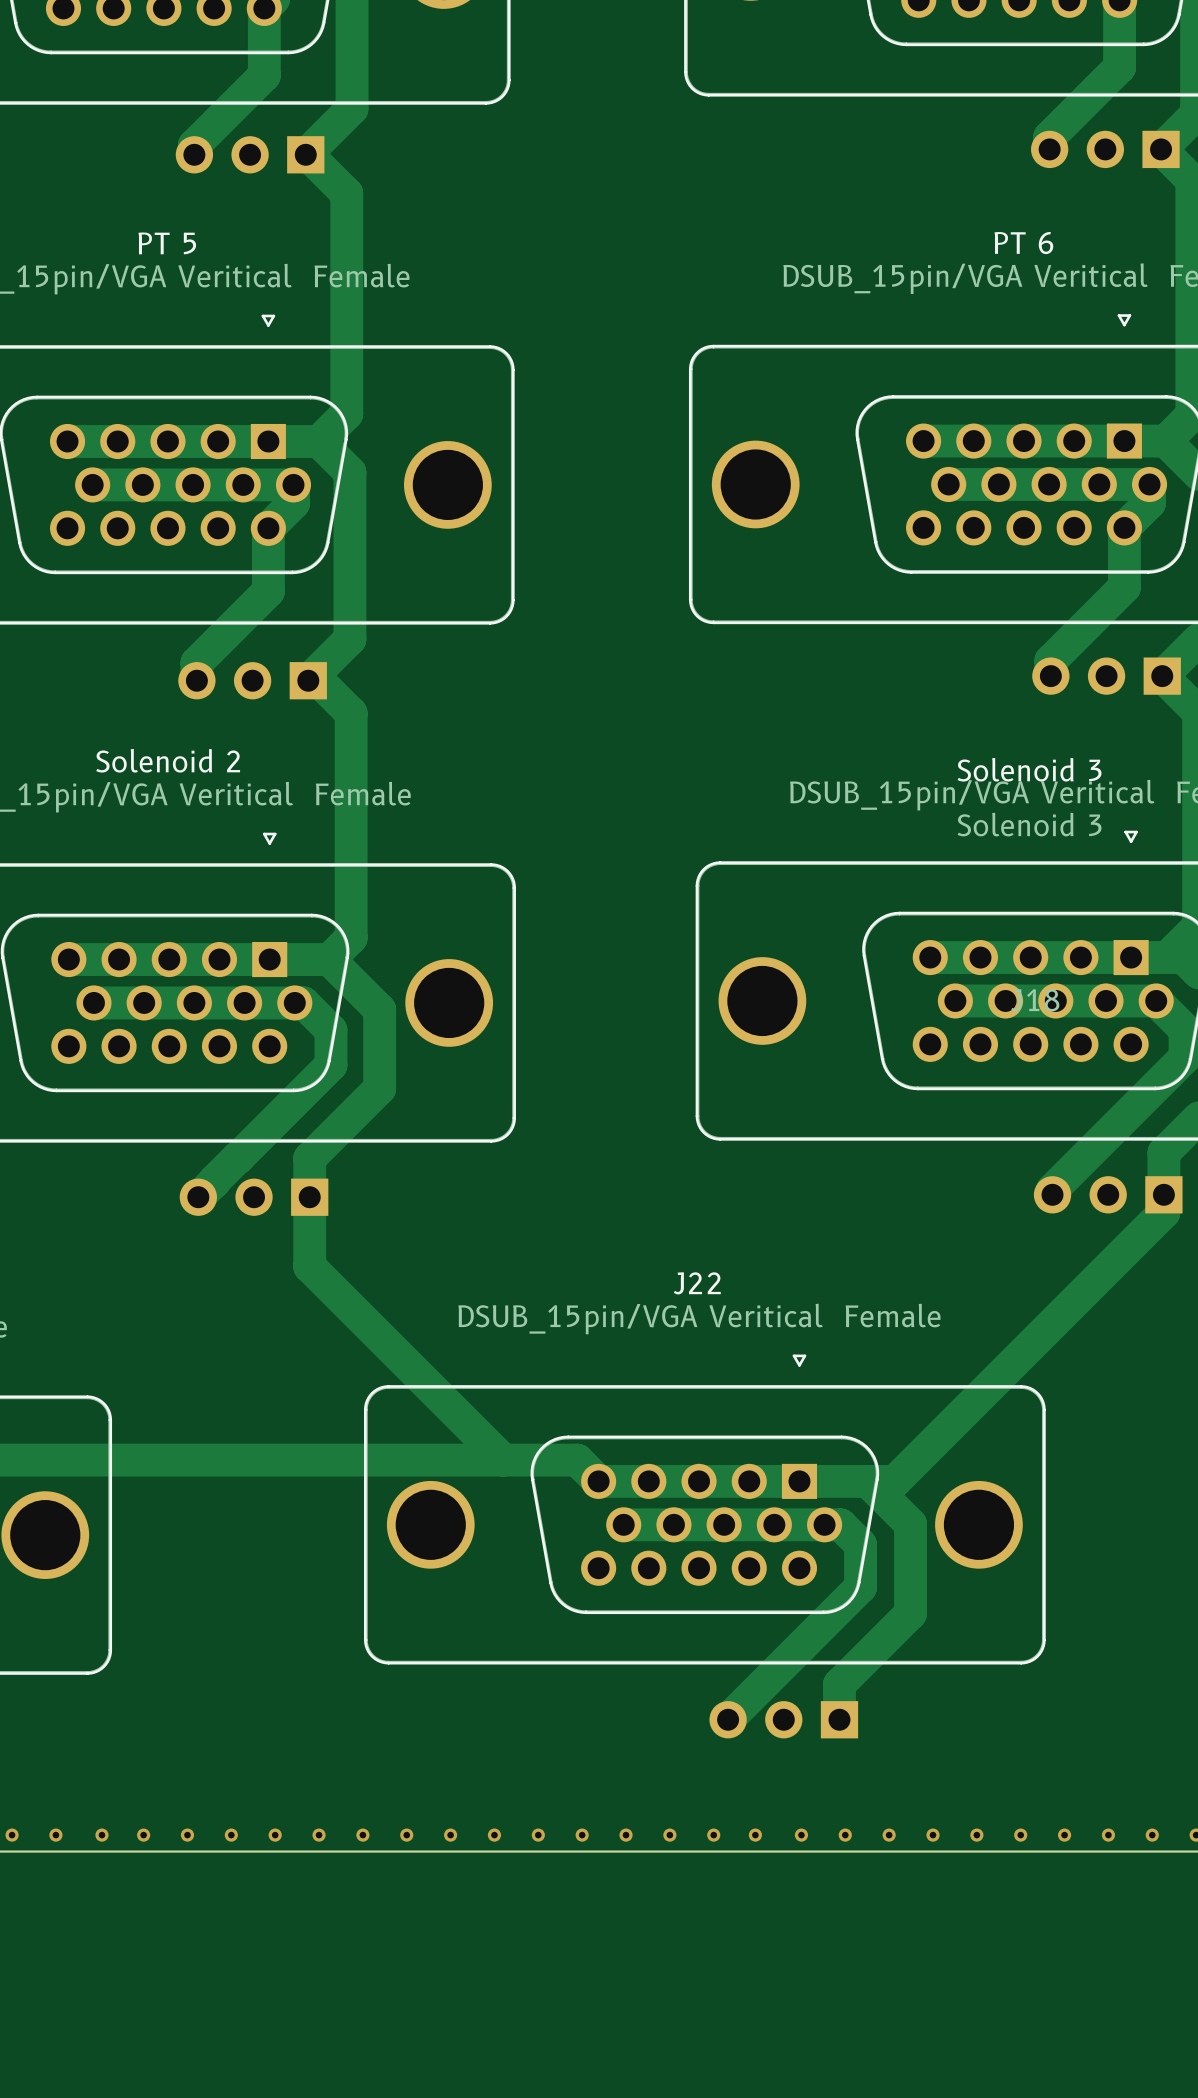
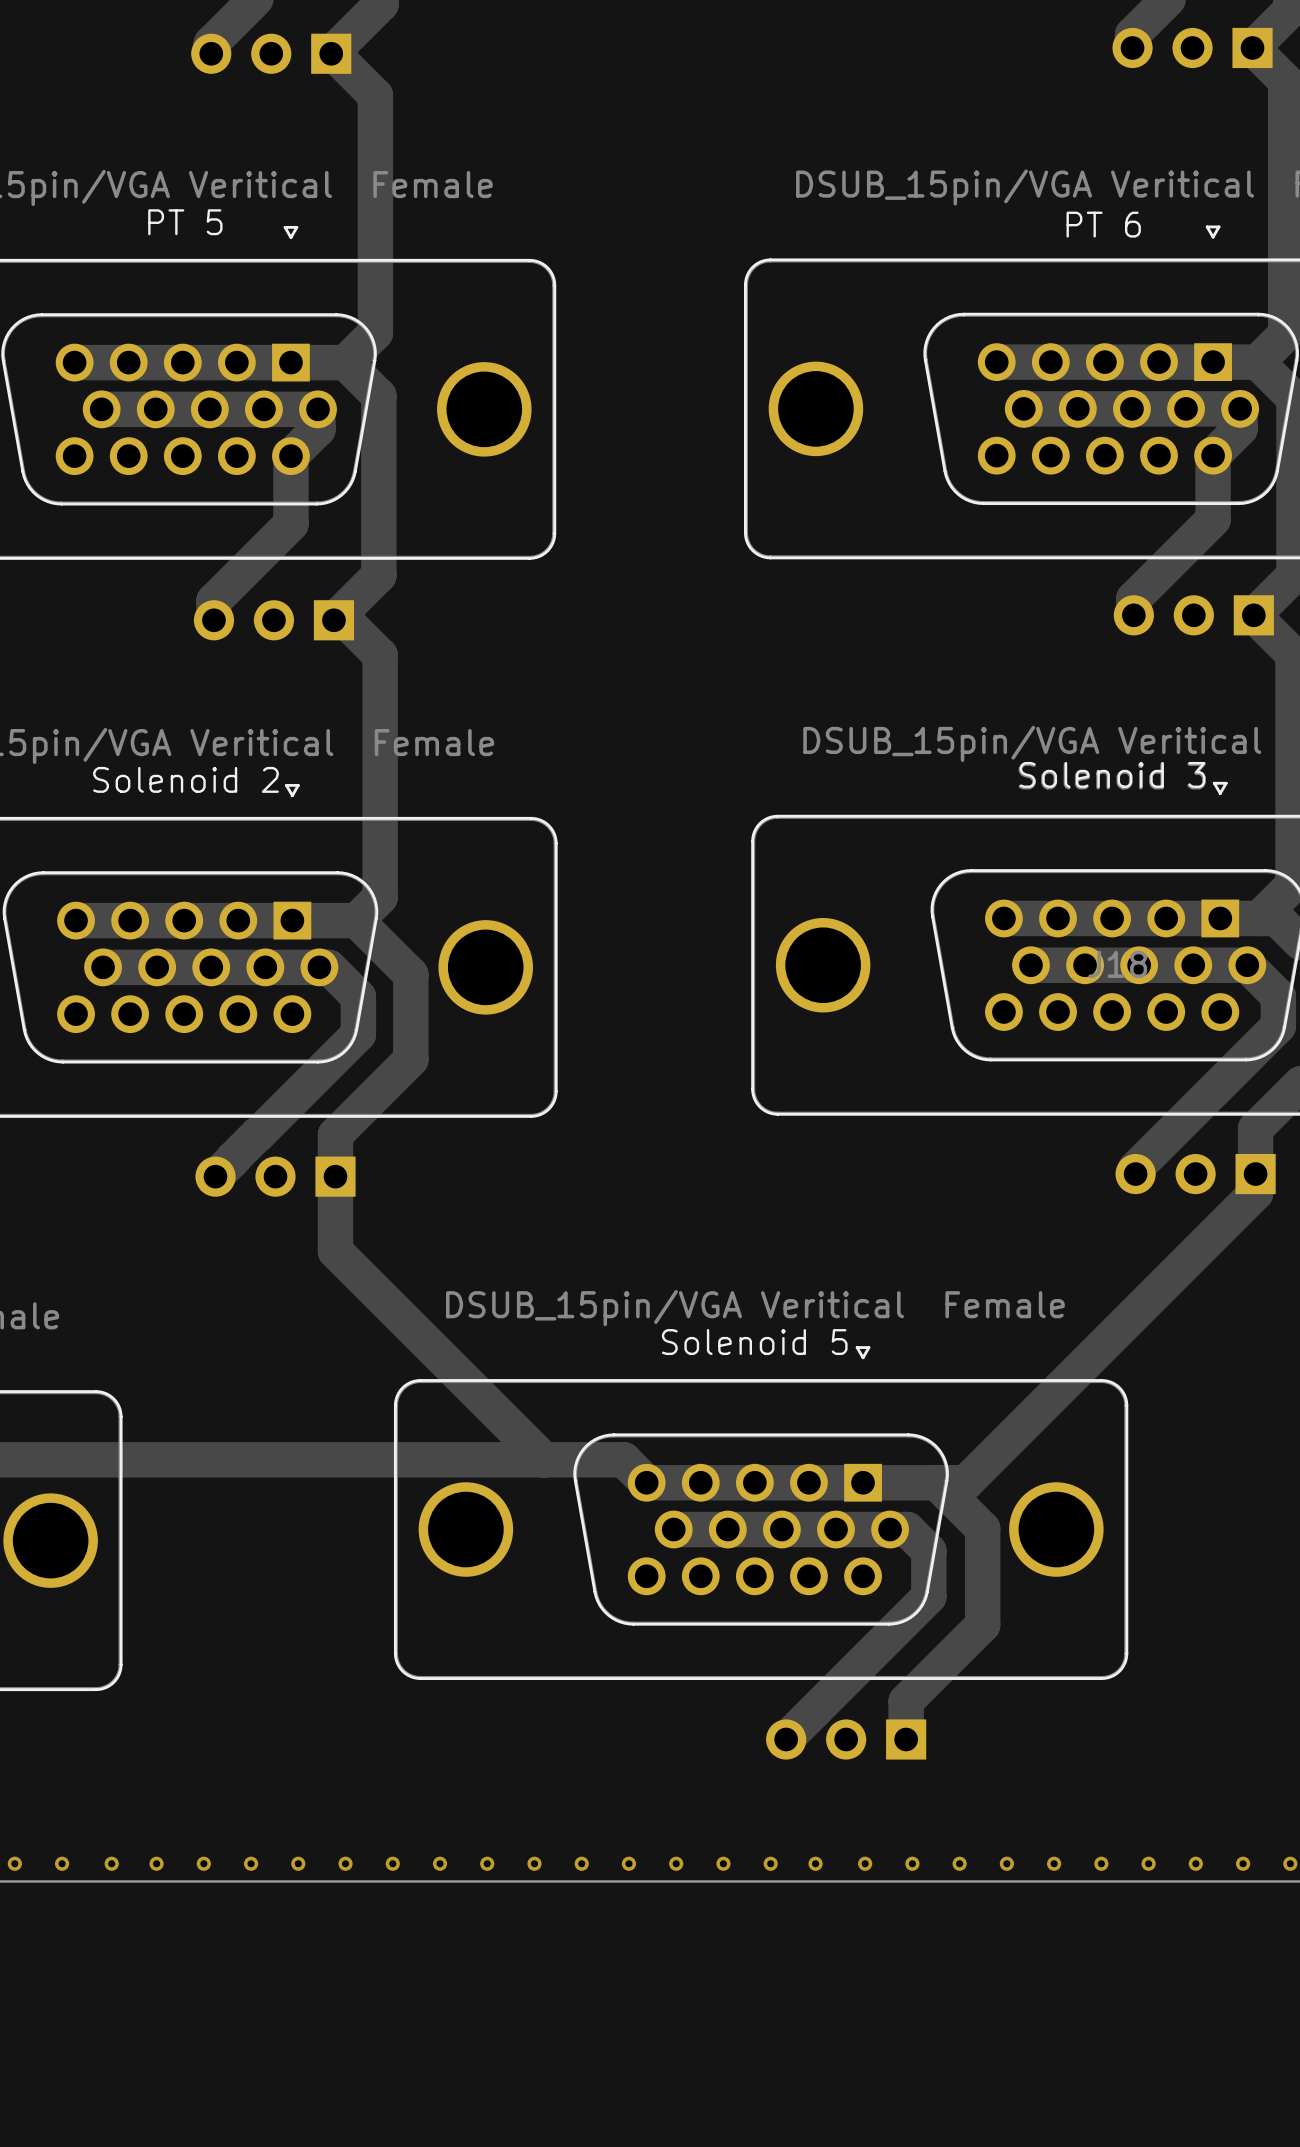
PT 5 name position: PT 5 (167, 243) -> PT 5 (185, 222)
PT 6 name position: PT 6 (1023, 243) -> PT 6 (1103, 224)
Solenoid 2 name position: Solenoid 2 (168, 760) -> Solenoid 2 (185, 779)
text position: Solenoid 3 (1029, 769) -> Solenoid 3 (1112, 774)
J22 name: J22 (697, 1283) -> Solenoid 5 (754, 1342)

